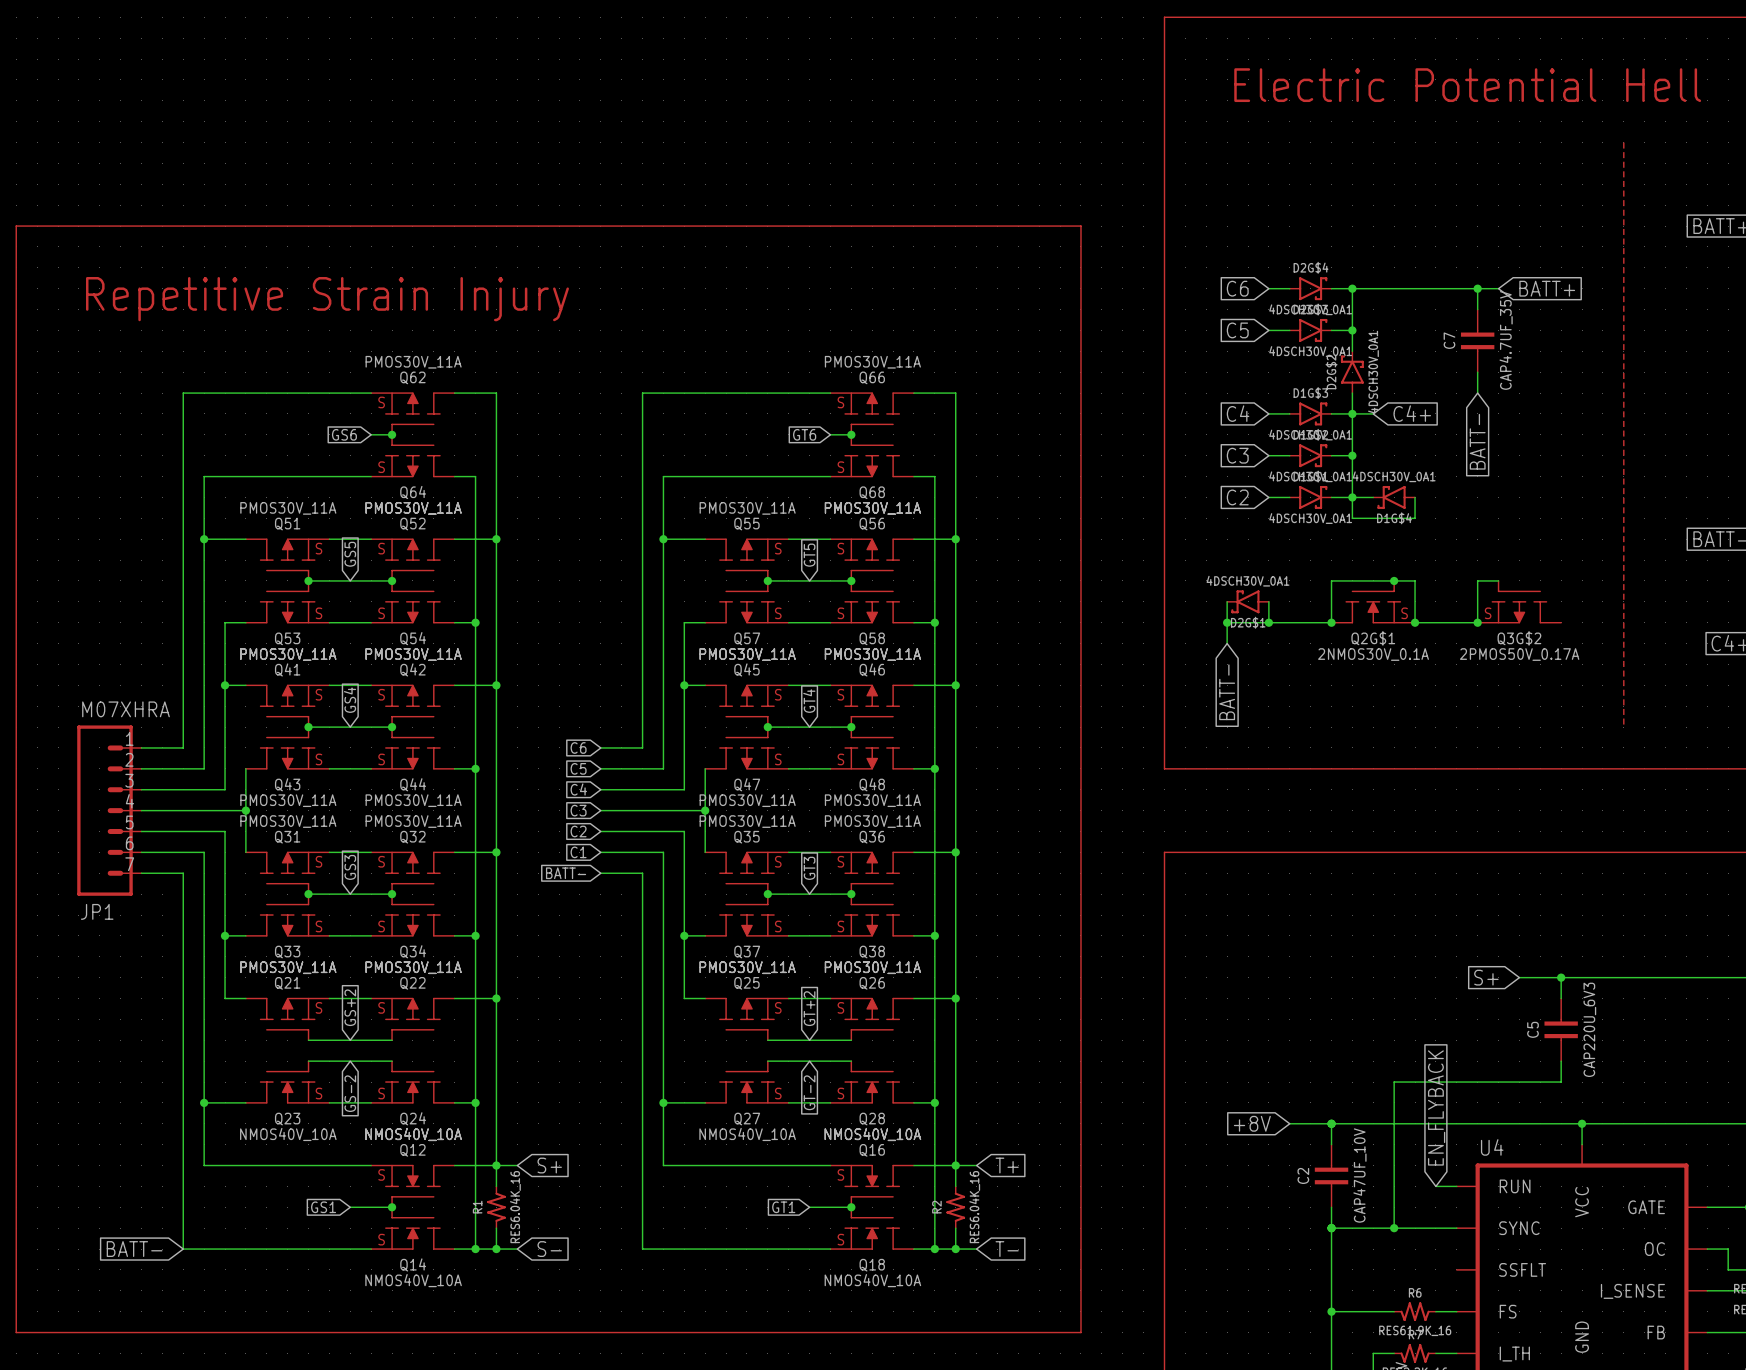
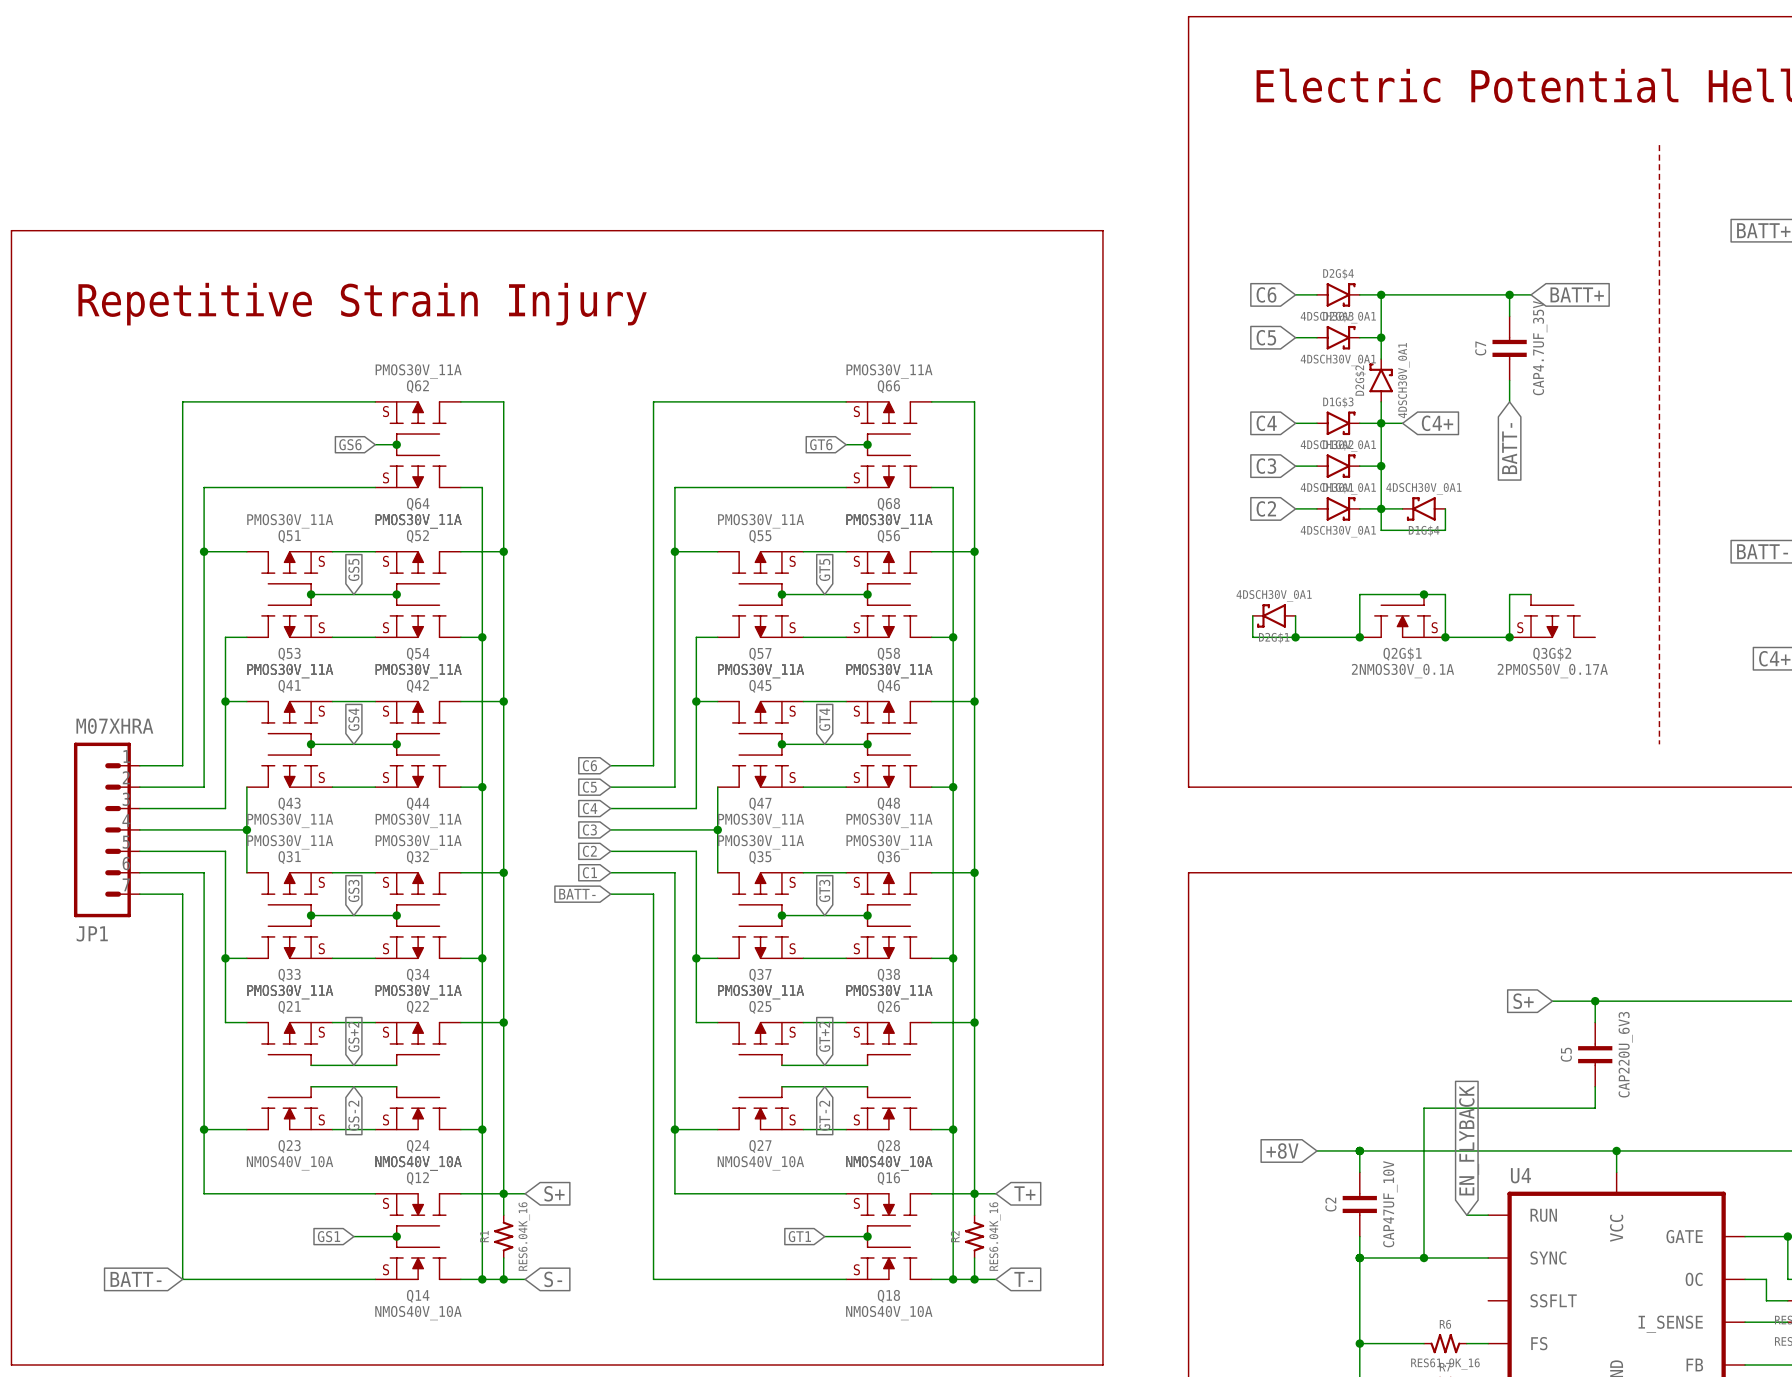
wire: (1227, 622) (1227, 643) -> none
junction: (1227, 622) -> none
global label: BATT- (1227, 692) -> none

